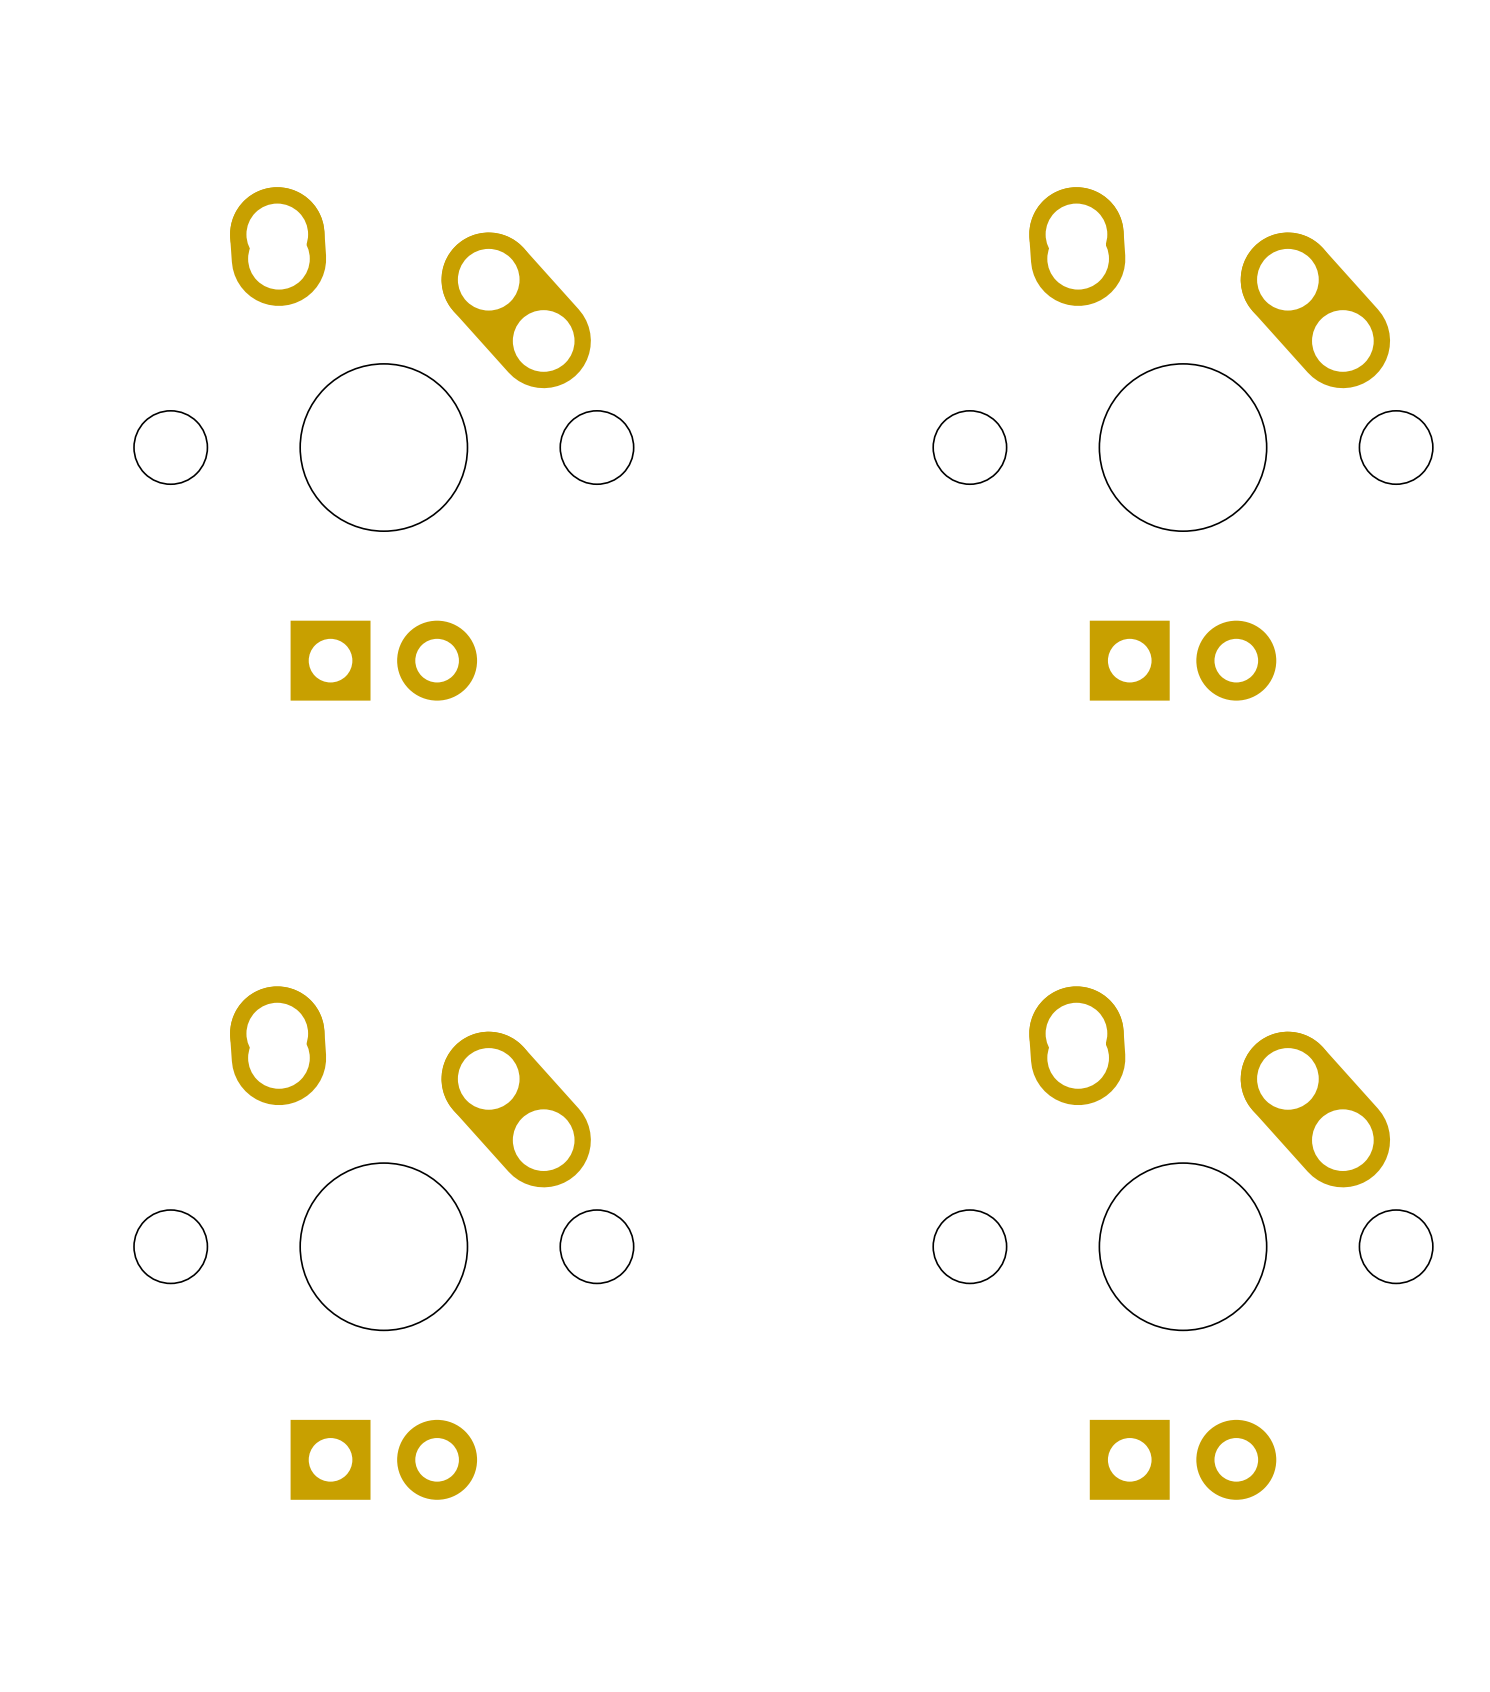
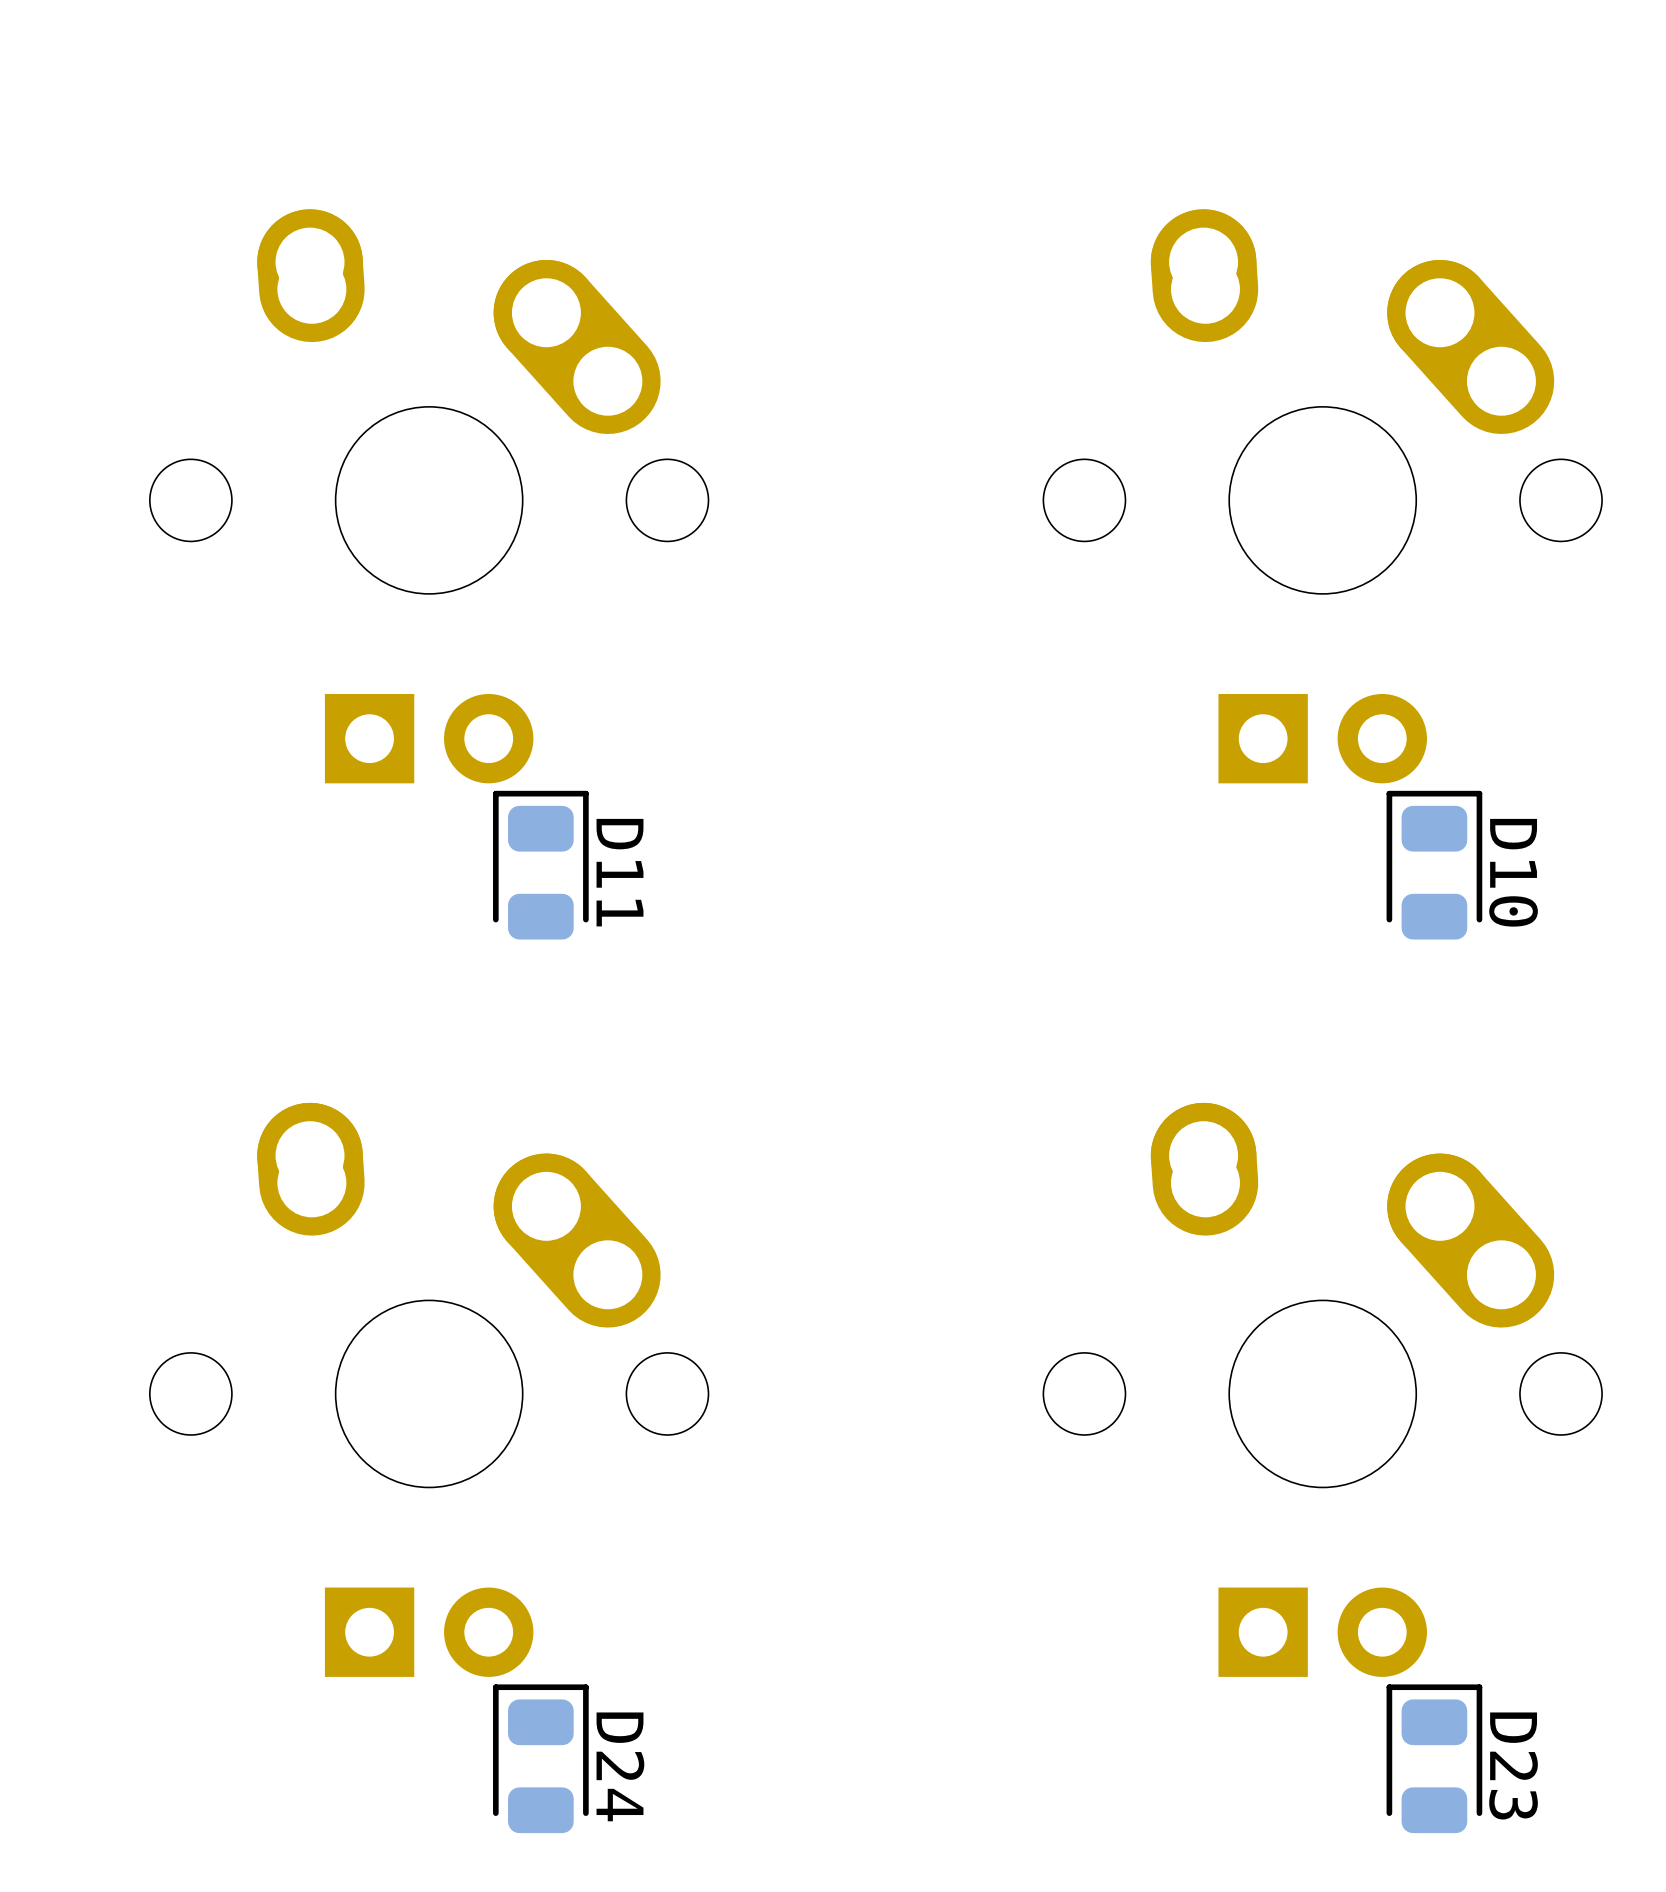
D11: none -> (540, 865)
D10: none -> (1434, 865)
D24: none -> (540, 1758)
D23: none -> (1434, 1758)

